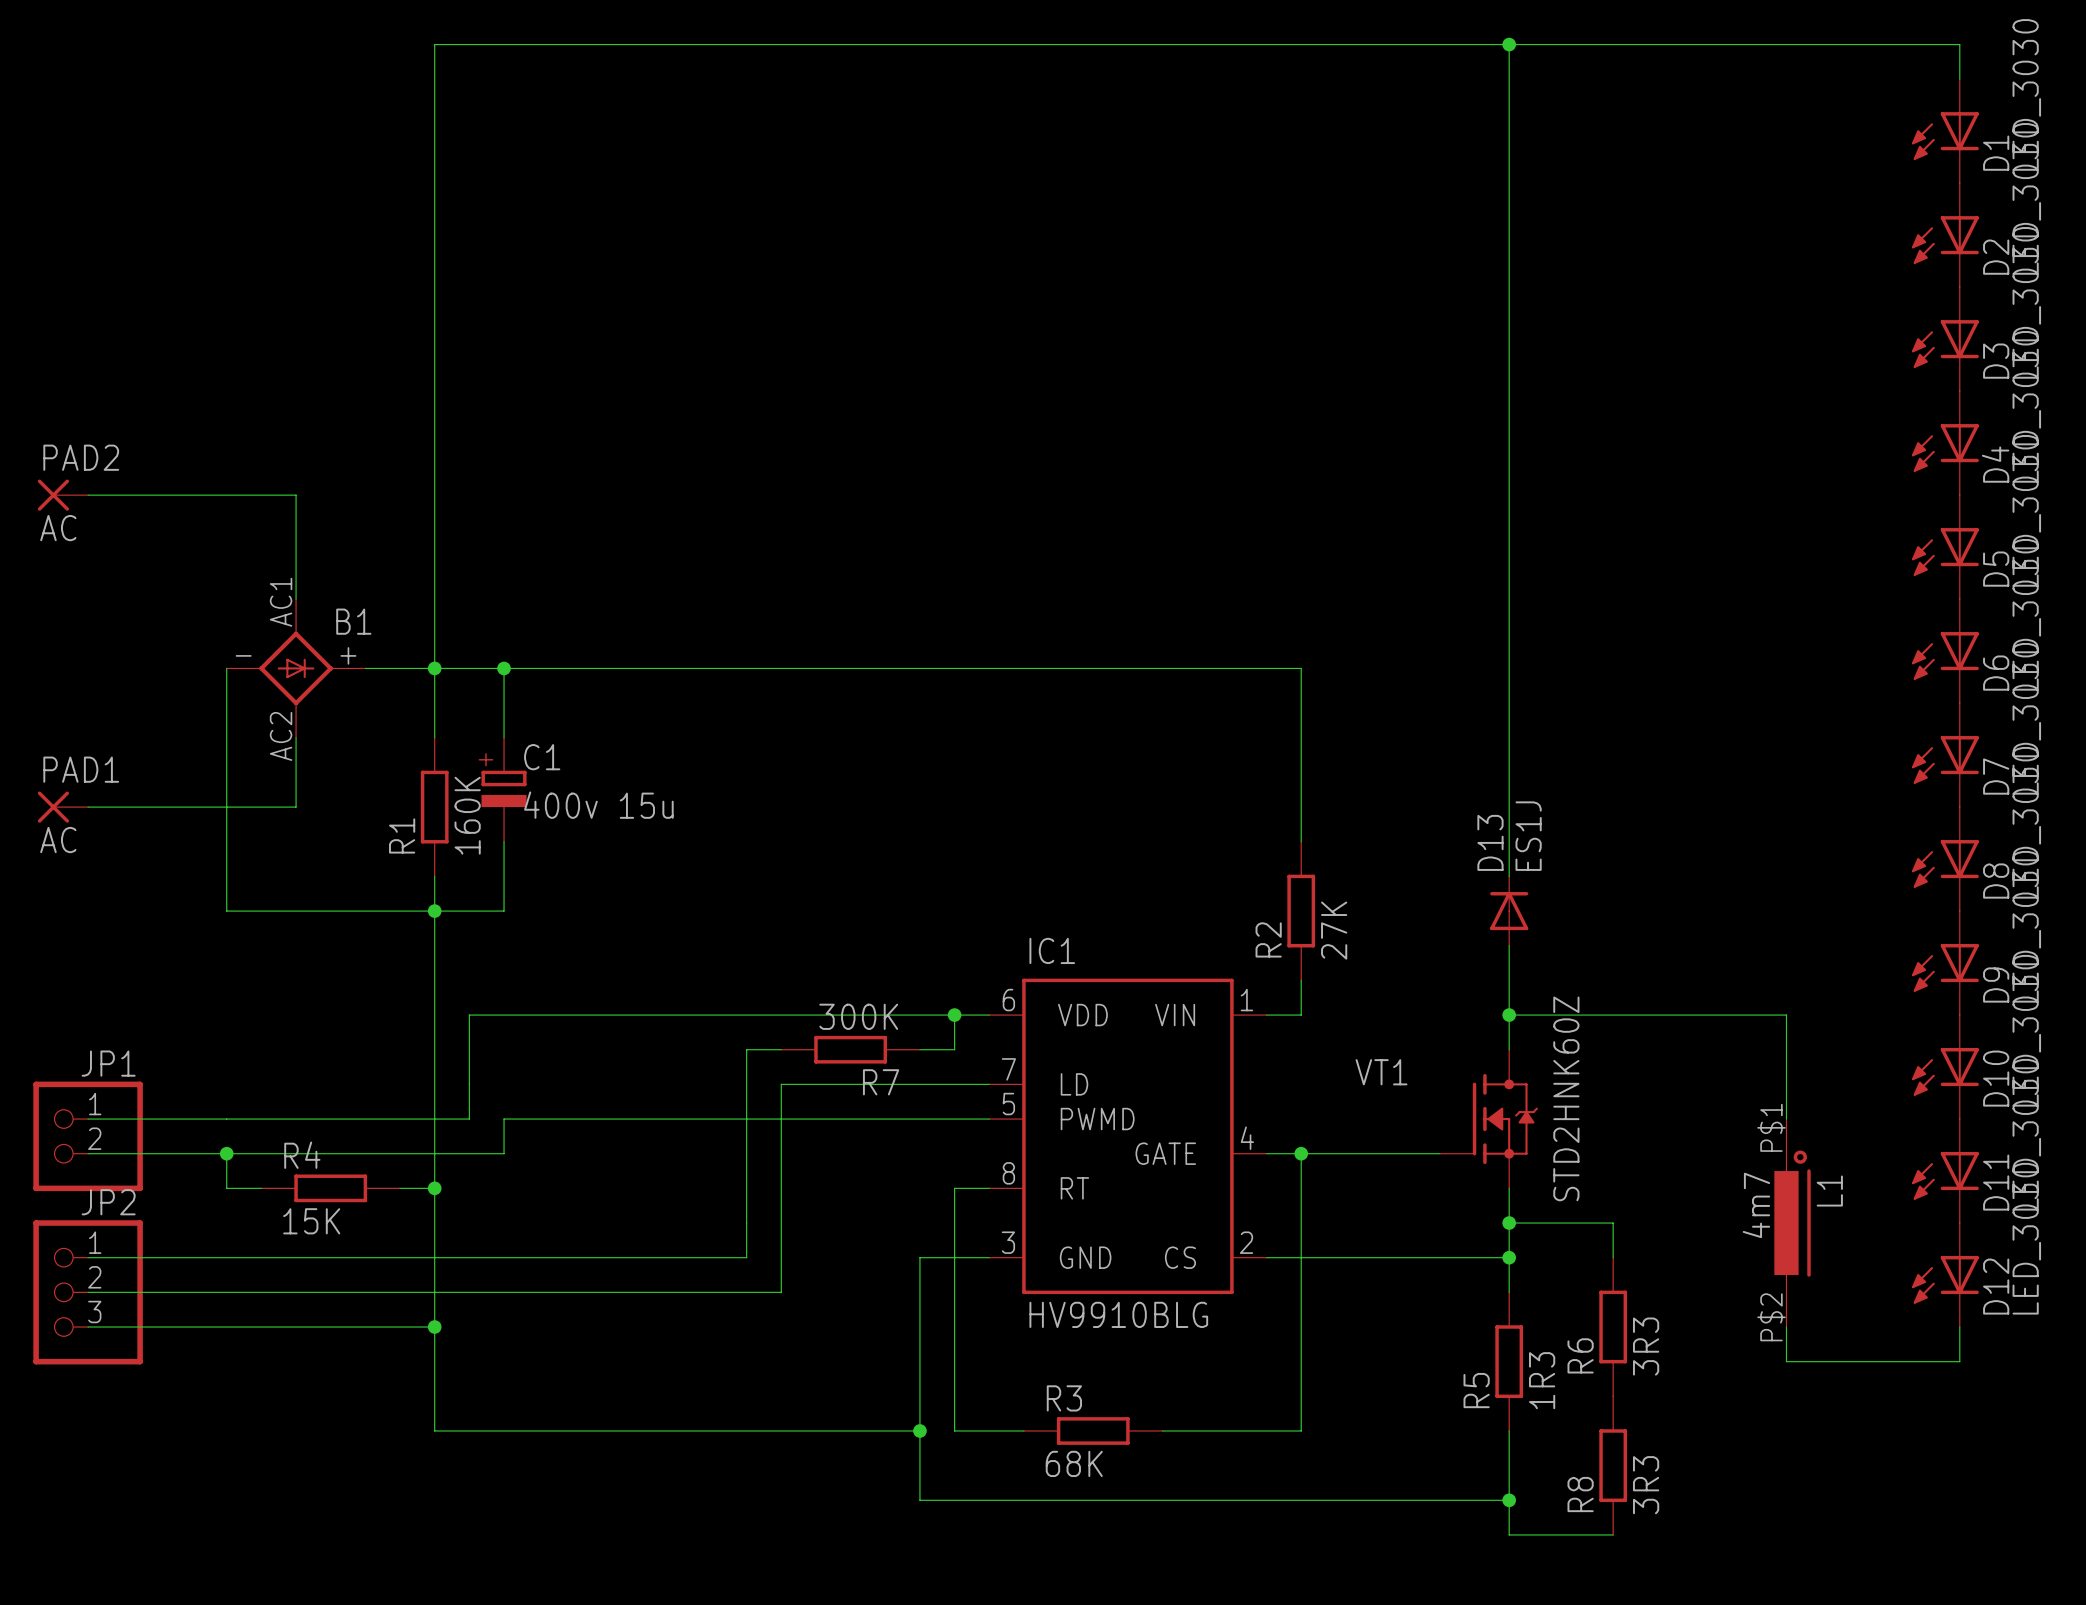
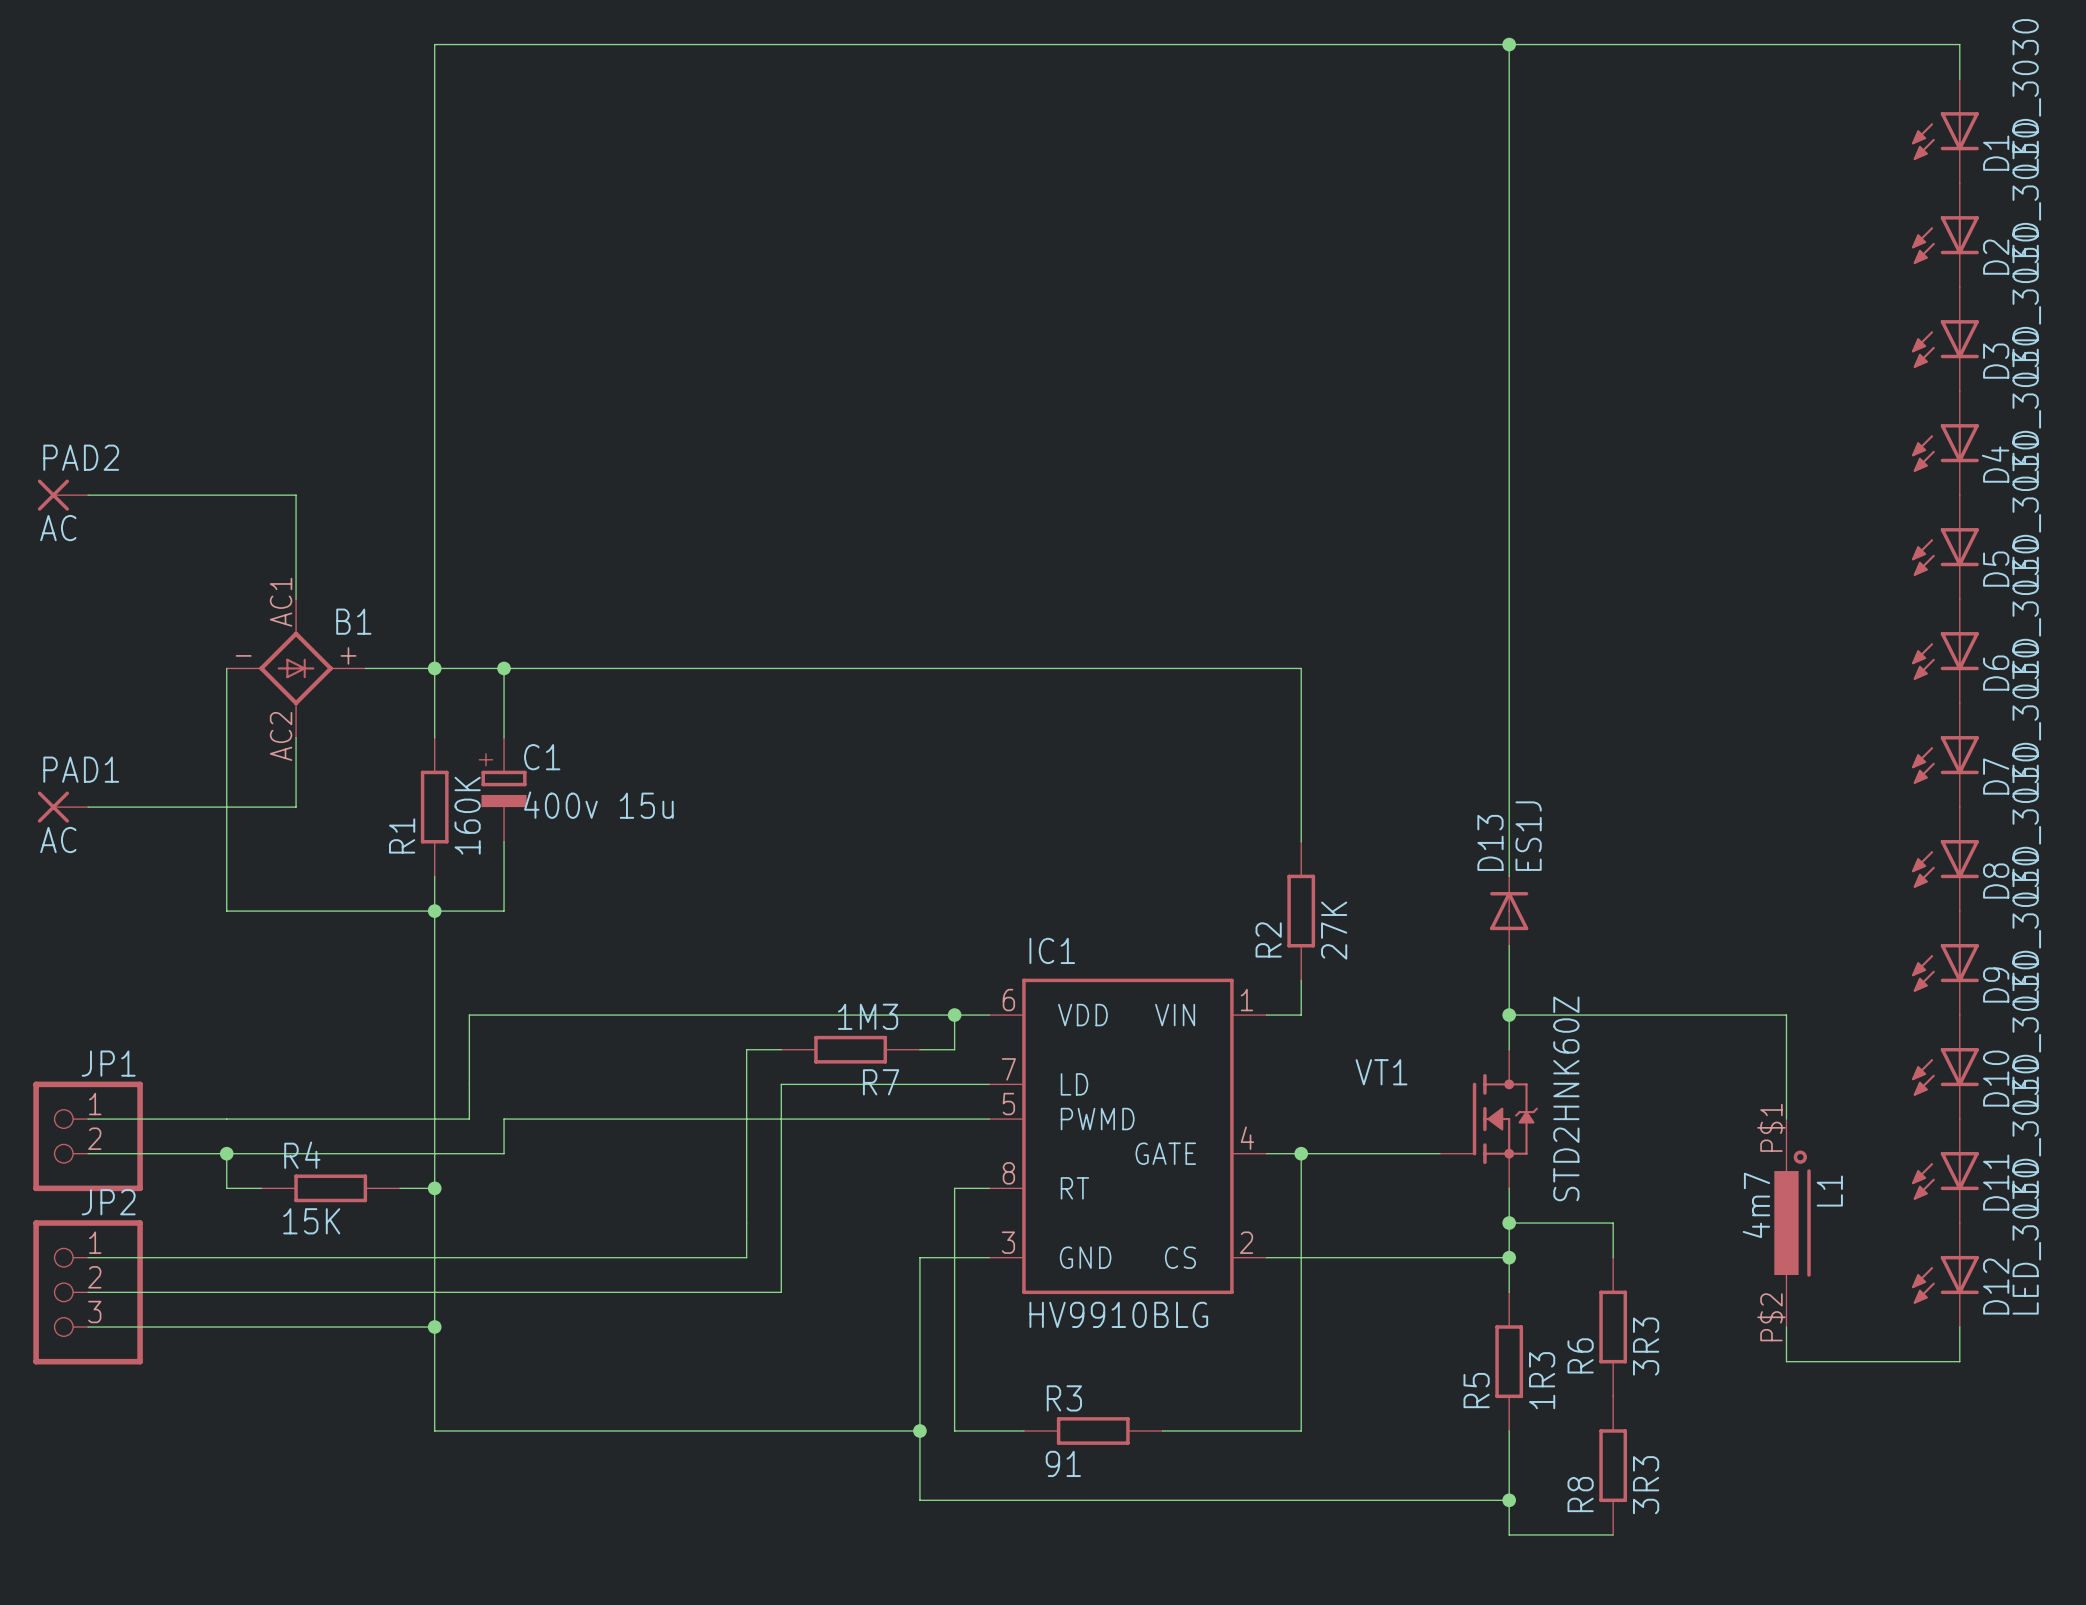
R7 value: 300K (858, 1016) -> 1M3 (868, 1016)
R3 value: 68K (1074, 1463) -> 91 (1063, 1463)

